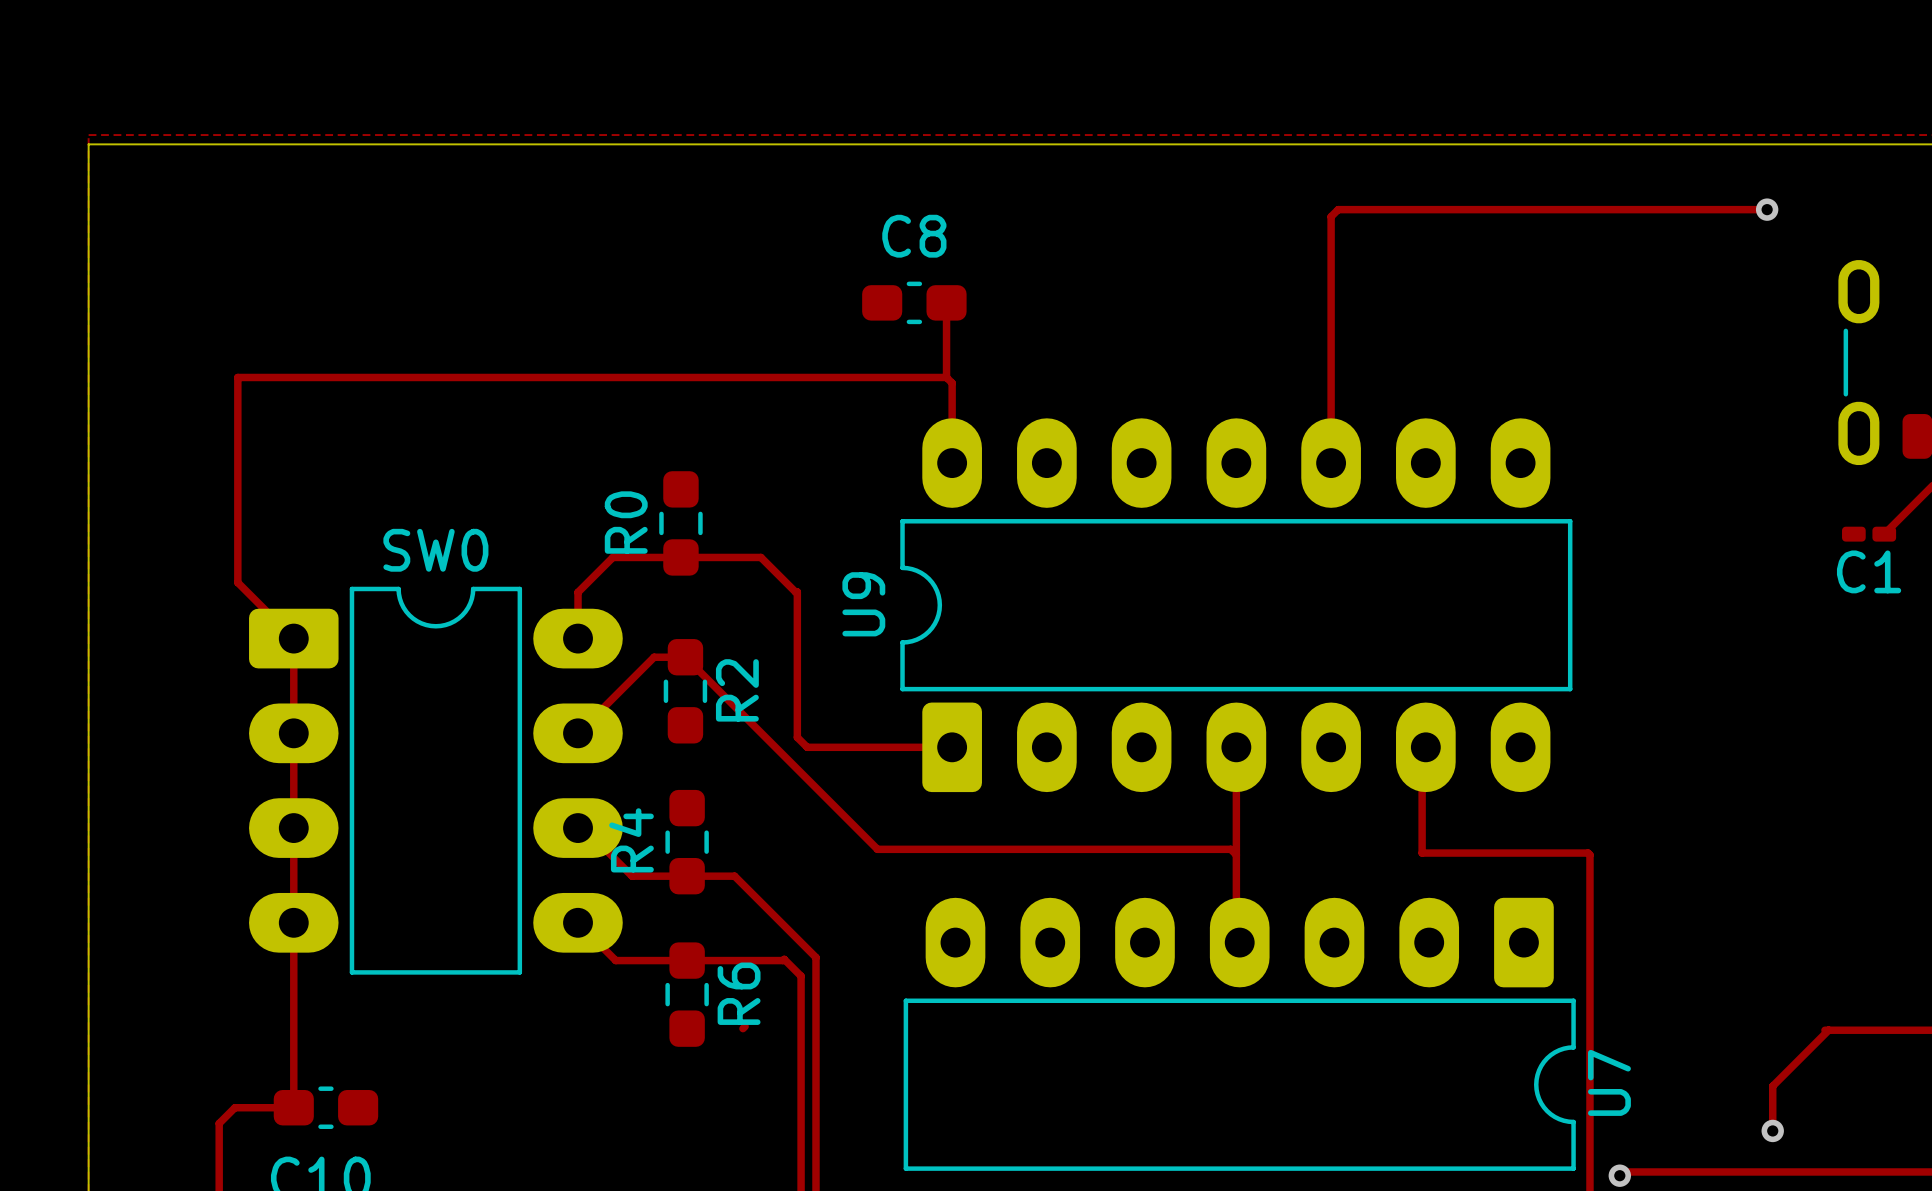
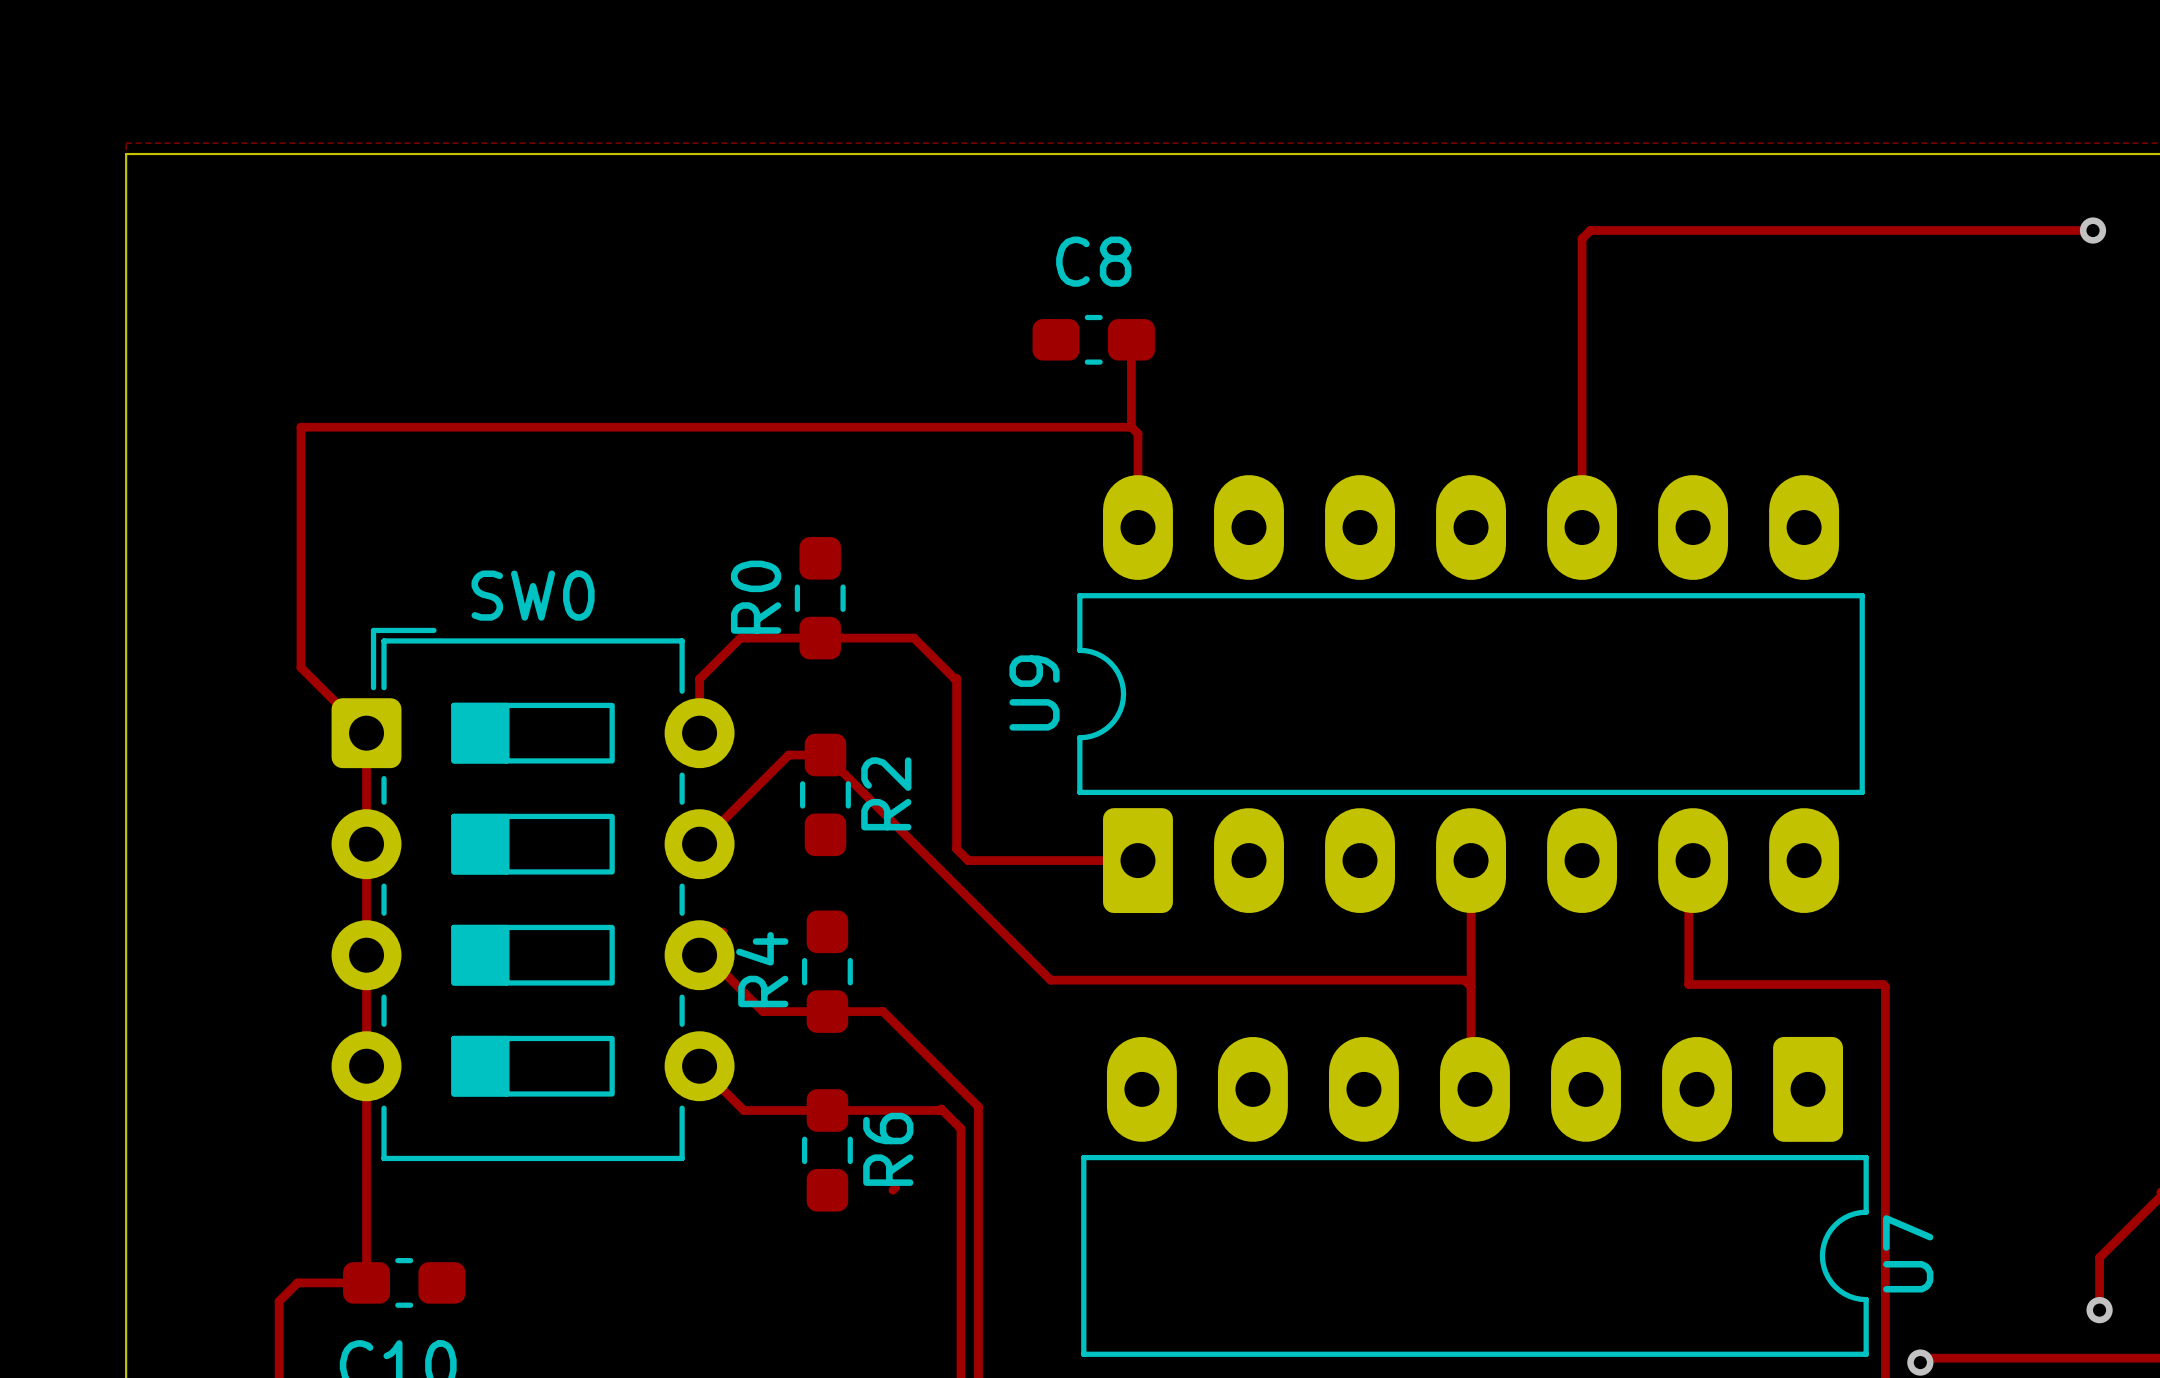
SW0 footprint: [249, 586, 623, 975] -> [331, 627, 735, 1162]

